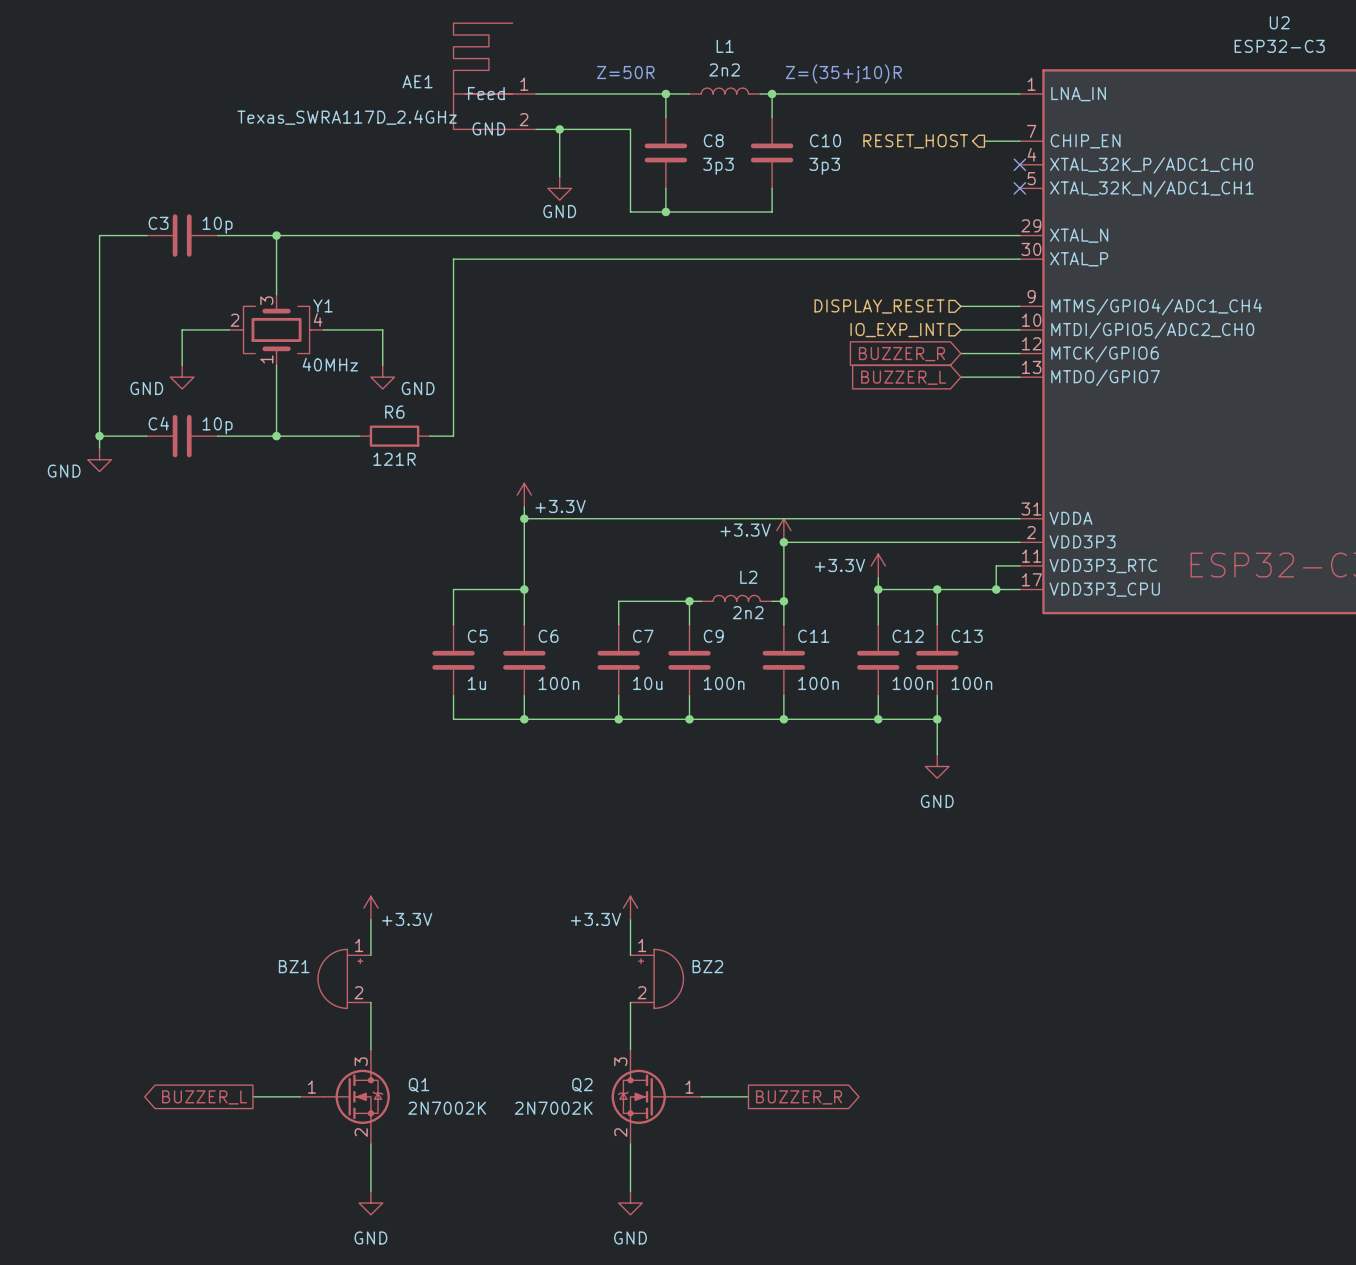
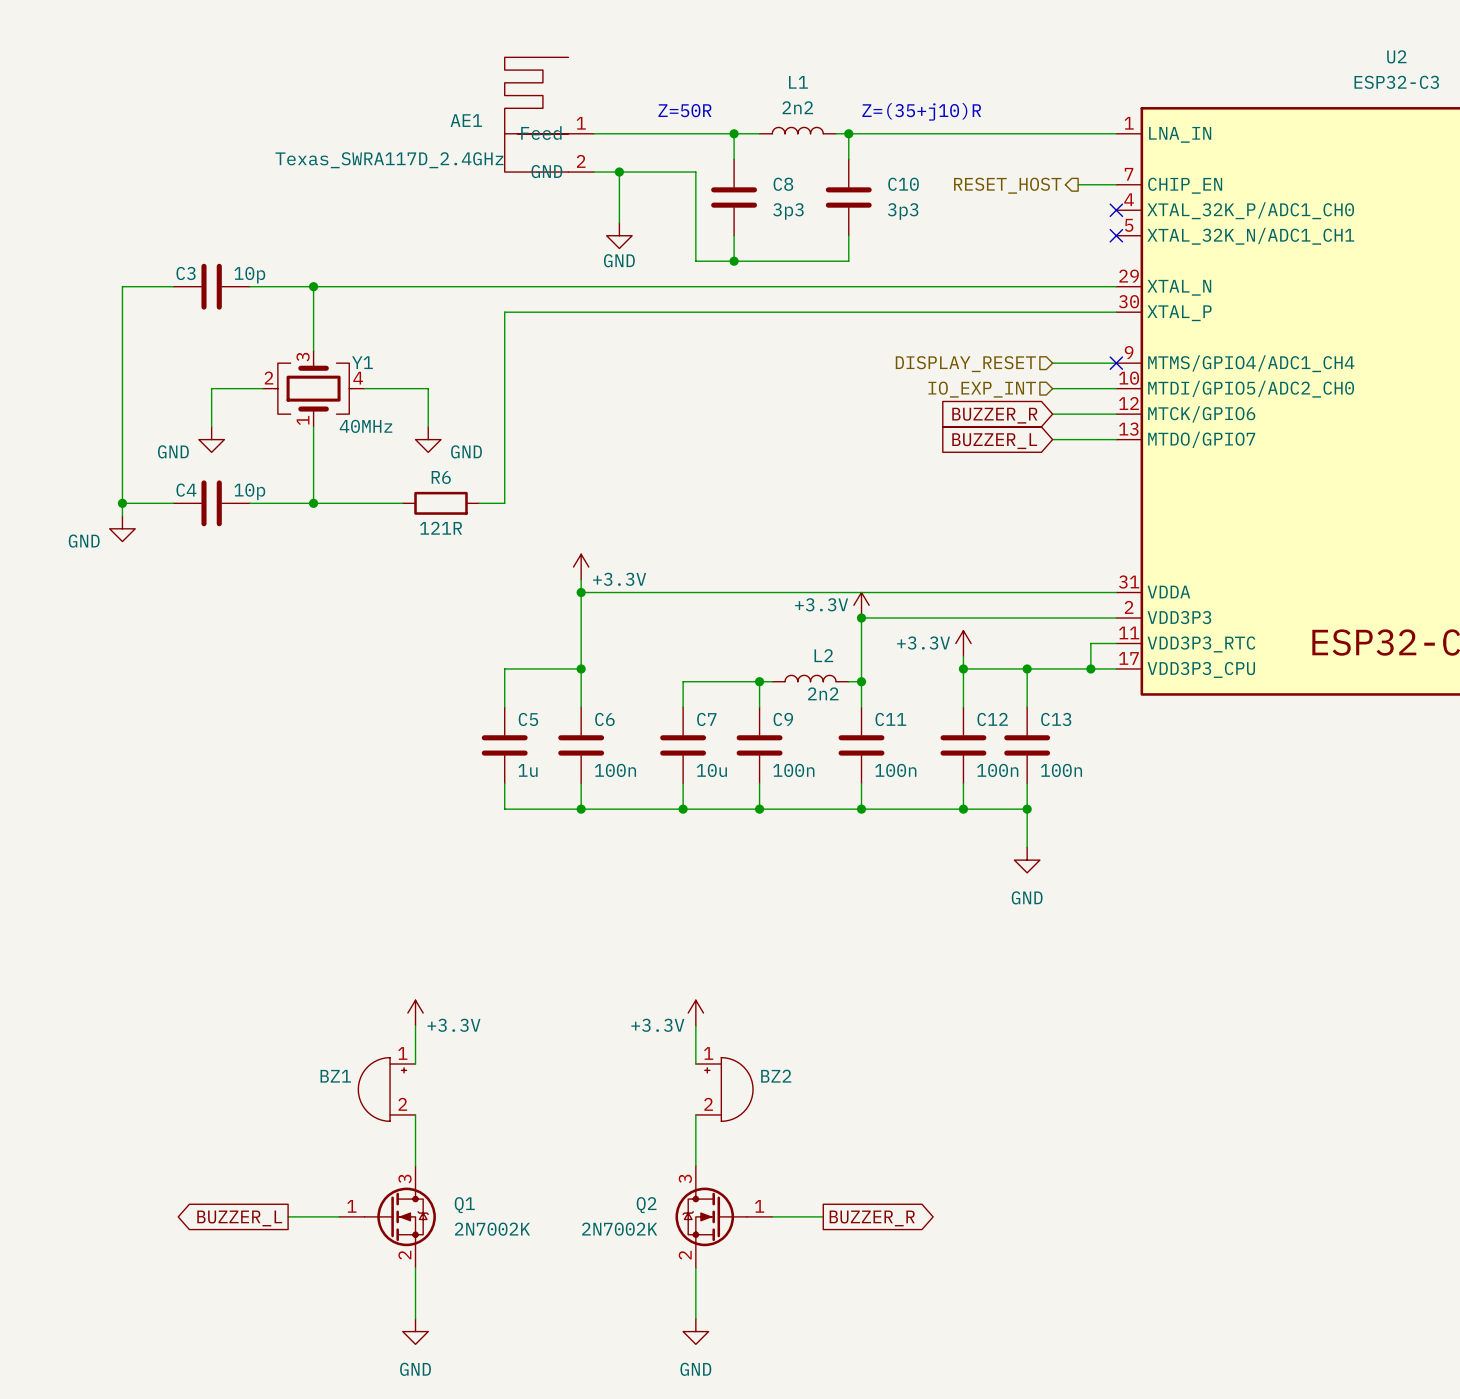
no-connect mark: none -> (1116, 363)

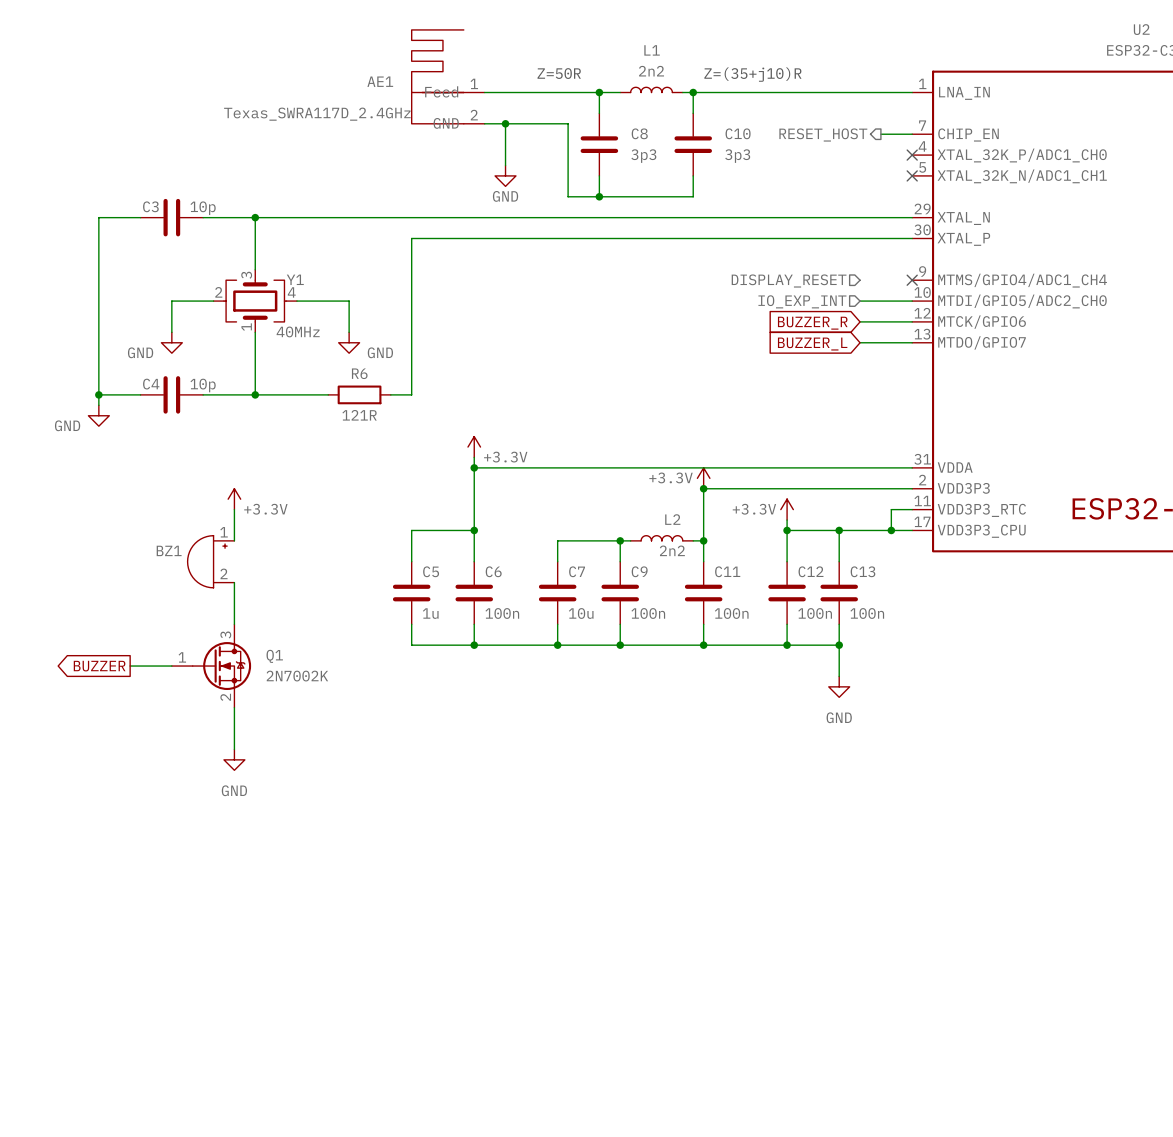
wire: (1052, 363) (1116, 363) -> none
power symbol: none -> +3.3V (234, 499)
wire: none -> (234, 509) (234, 540)
wire: none -> (234, 582) (234, 624)
global label: none -> BUZZER (99, 666)
wire: none -> (130, 666) (171, 666)
wire: none -> (234, 707) (234, 749)
power symbol: none -> GND (234, 759)
power symbol: +3.3V (415, 1013) -> none
power symbol: +3.3V (695, 1013) -> none
wire: (415, 1025) (415, 1063) -> none
wire: (695, 1025) (695, 1063) -> none
BZ1 position: (386, 1089) -> (211, 561)
BZ2: (724, 1089) -> none
wire: (415, 1114) (415, 1165) -> none
wire: (695, 1114) (695, 1165) -> none
wire: (288, 1216) (339, 1216) -> none
Q1 position: (387, 1216) -> (211, 666)
Q2: 2N7002K (723, 1216) -> none
wire: (772, 1216) (823, 1216) -> none
global label: BUZZER_L (239, 1218) -> none
global label: BUZZER_R (872, 1218) -> none
wire: (415, 1267) (415, 1318) -> none
wire: (695, 1267) (695, 1318) -> none
power symbol: GND (415, 1331) -> none
power symbol: GND (695, 1331) -> none

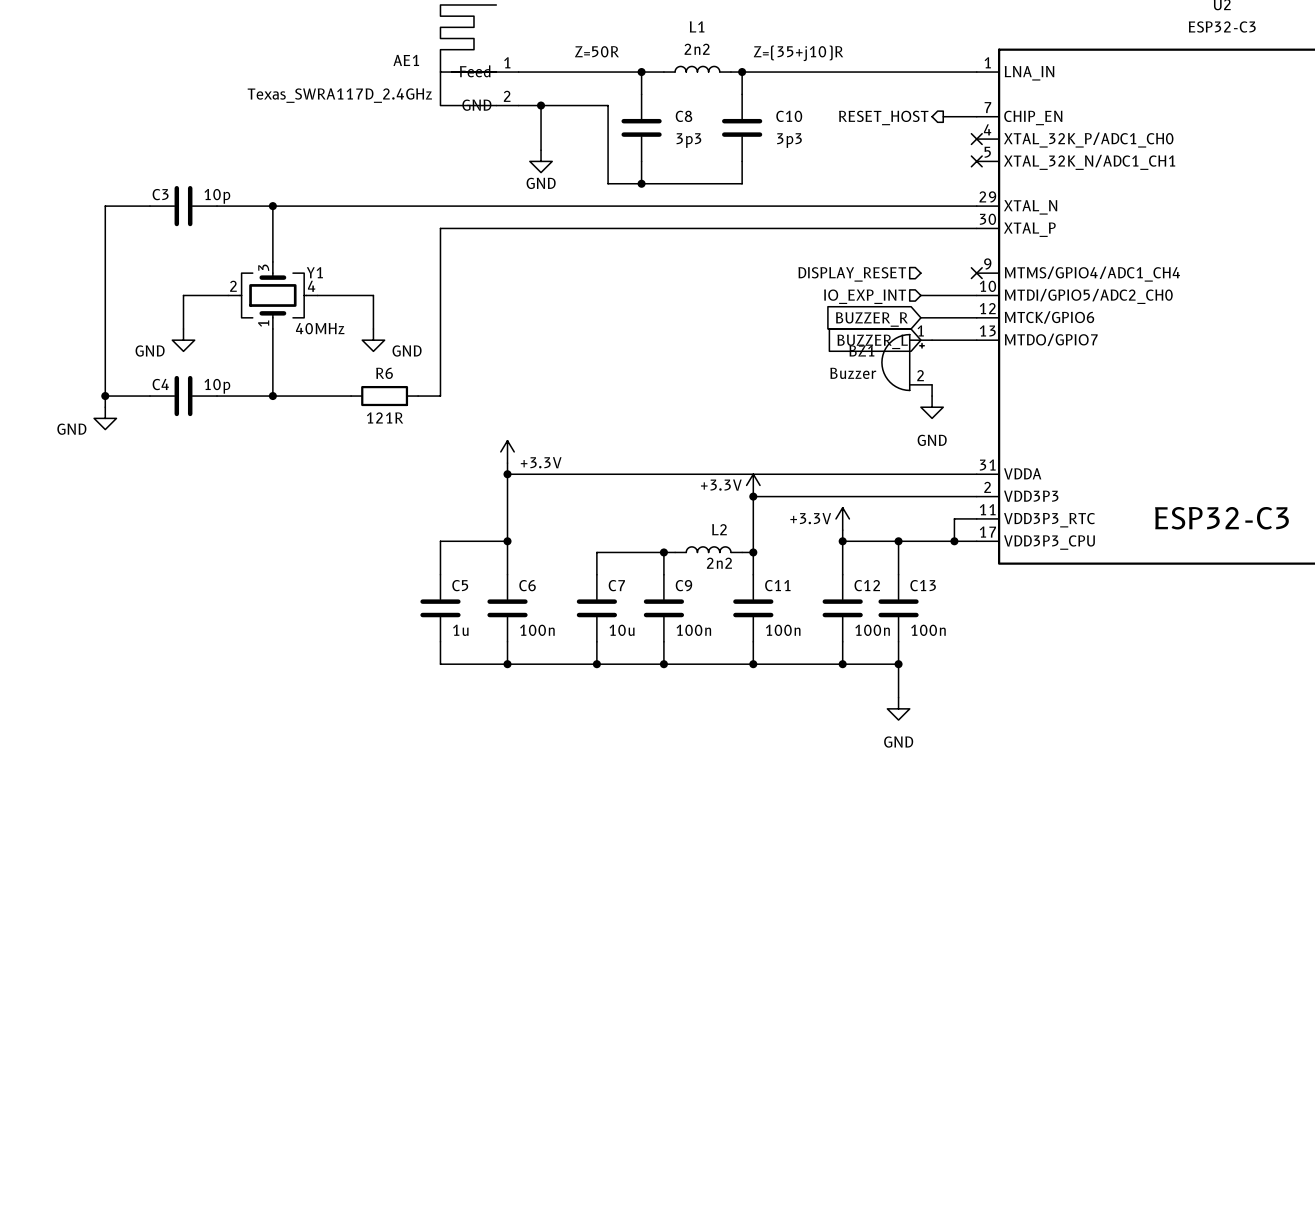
BZ1 value: none -> Buzzer (853, 373)
wire: none -> (932, 384) (932, 396)
power symbol: none -> GND (932, 407)
power symbol: +3.3V (234, 499) -> none
wire: (234, 509) (234, 540) -> none
BZ1 position: (211, 561) -> (906, 362)
wire: (234, 582) (234, 624) -> none
global label: BUZZER (99, 666) -> none
wire: (130, 666) (171, 666) -> none
Q1: 2N7002K (211, 666) -> none
wire: (234, 707) (234, 749) -> none
power symbol: GND (234, 759) -> none

